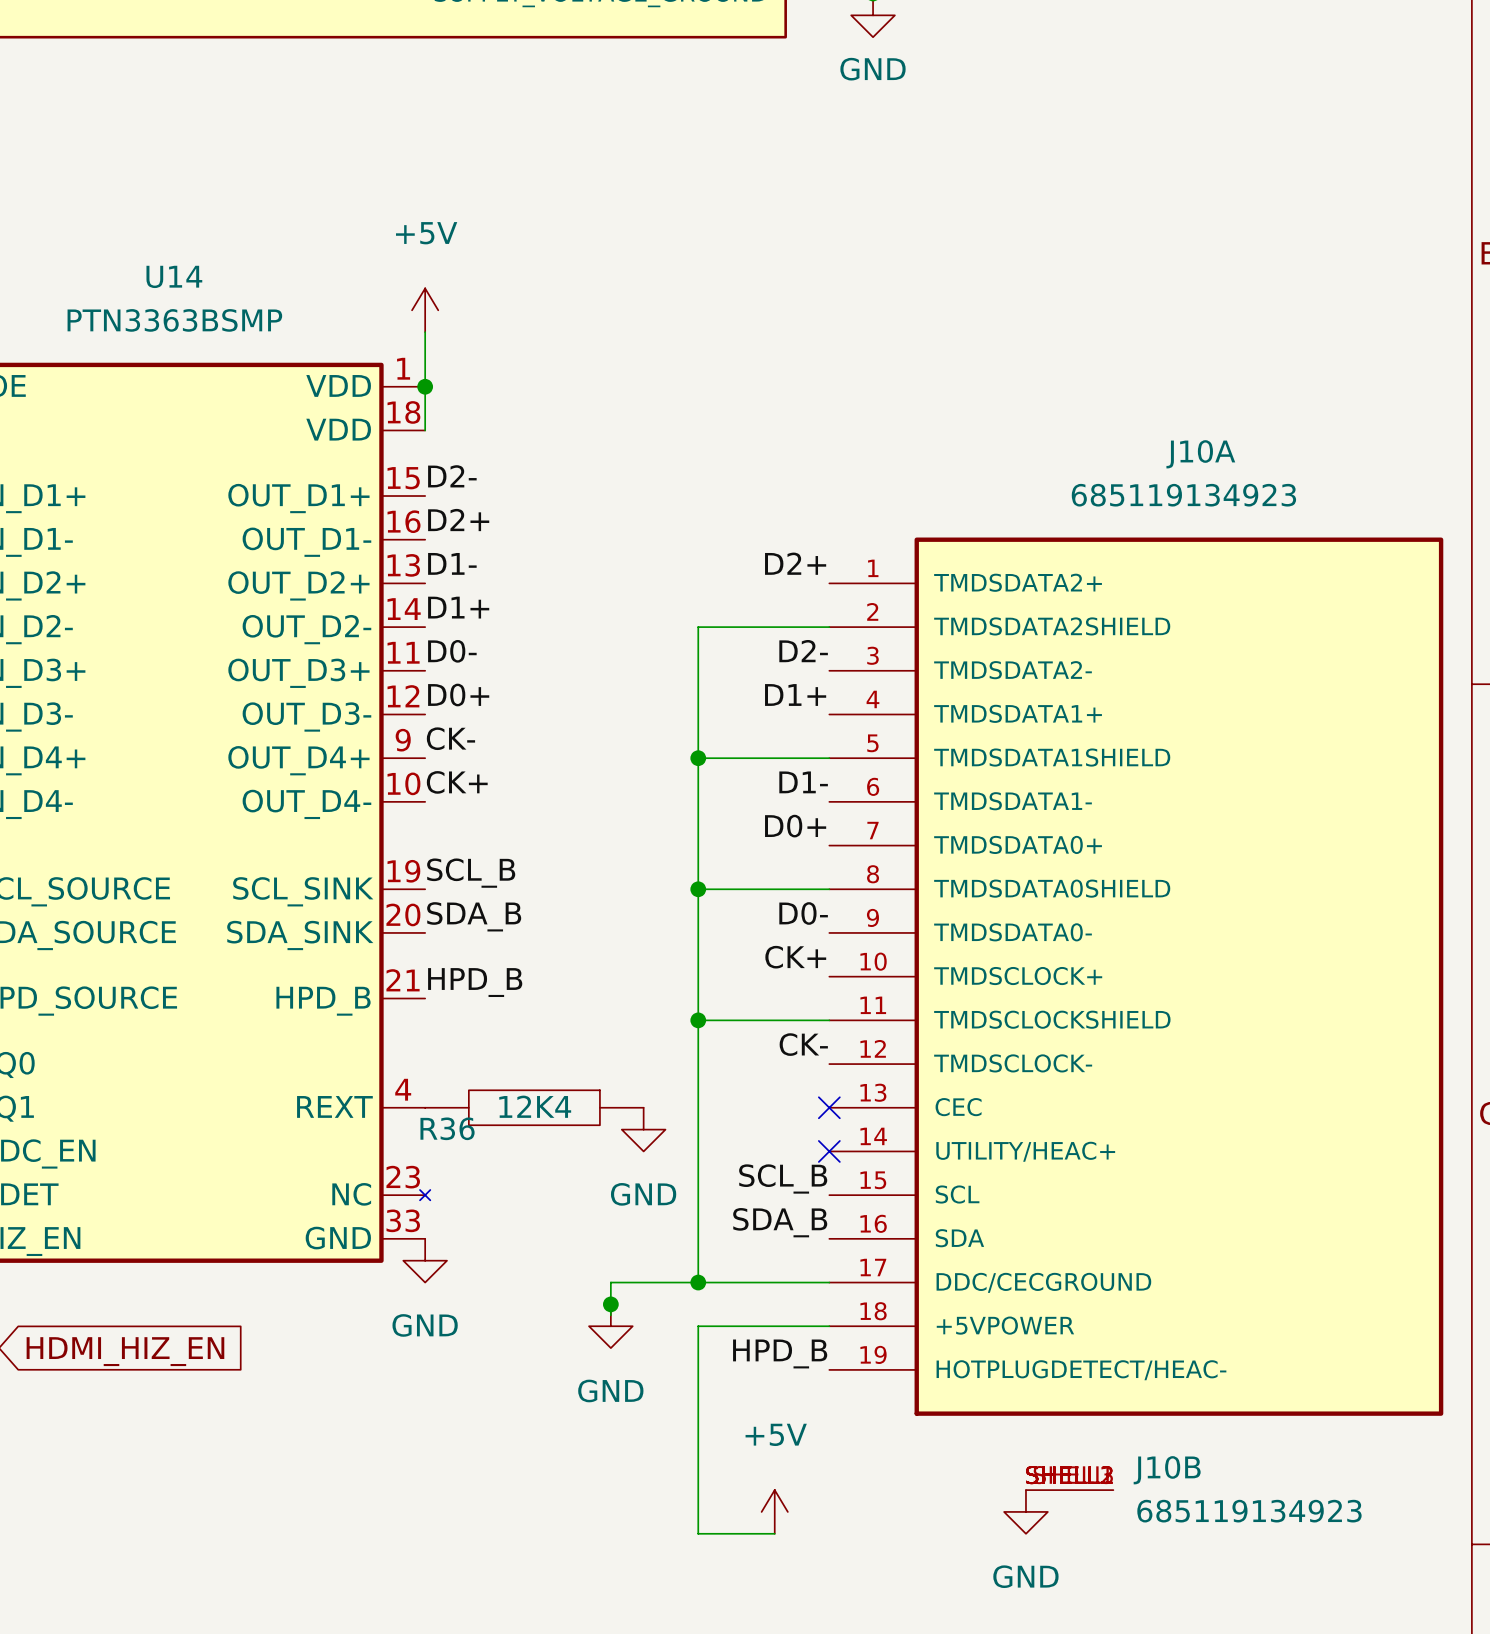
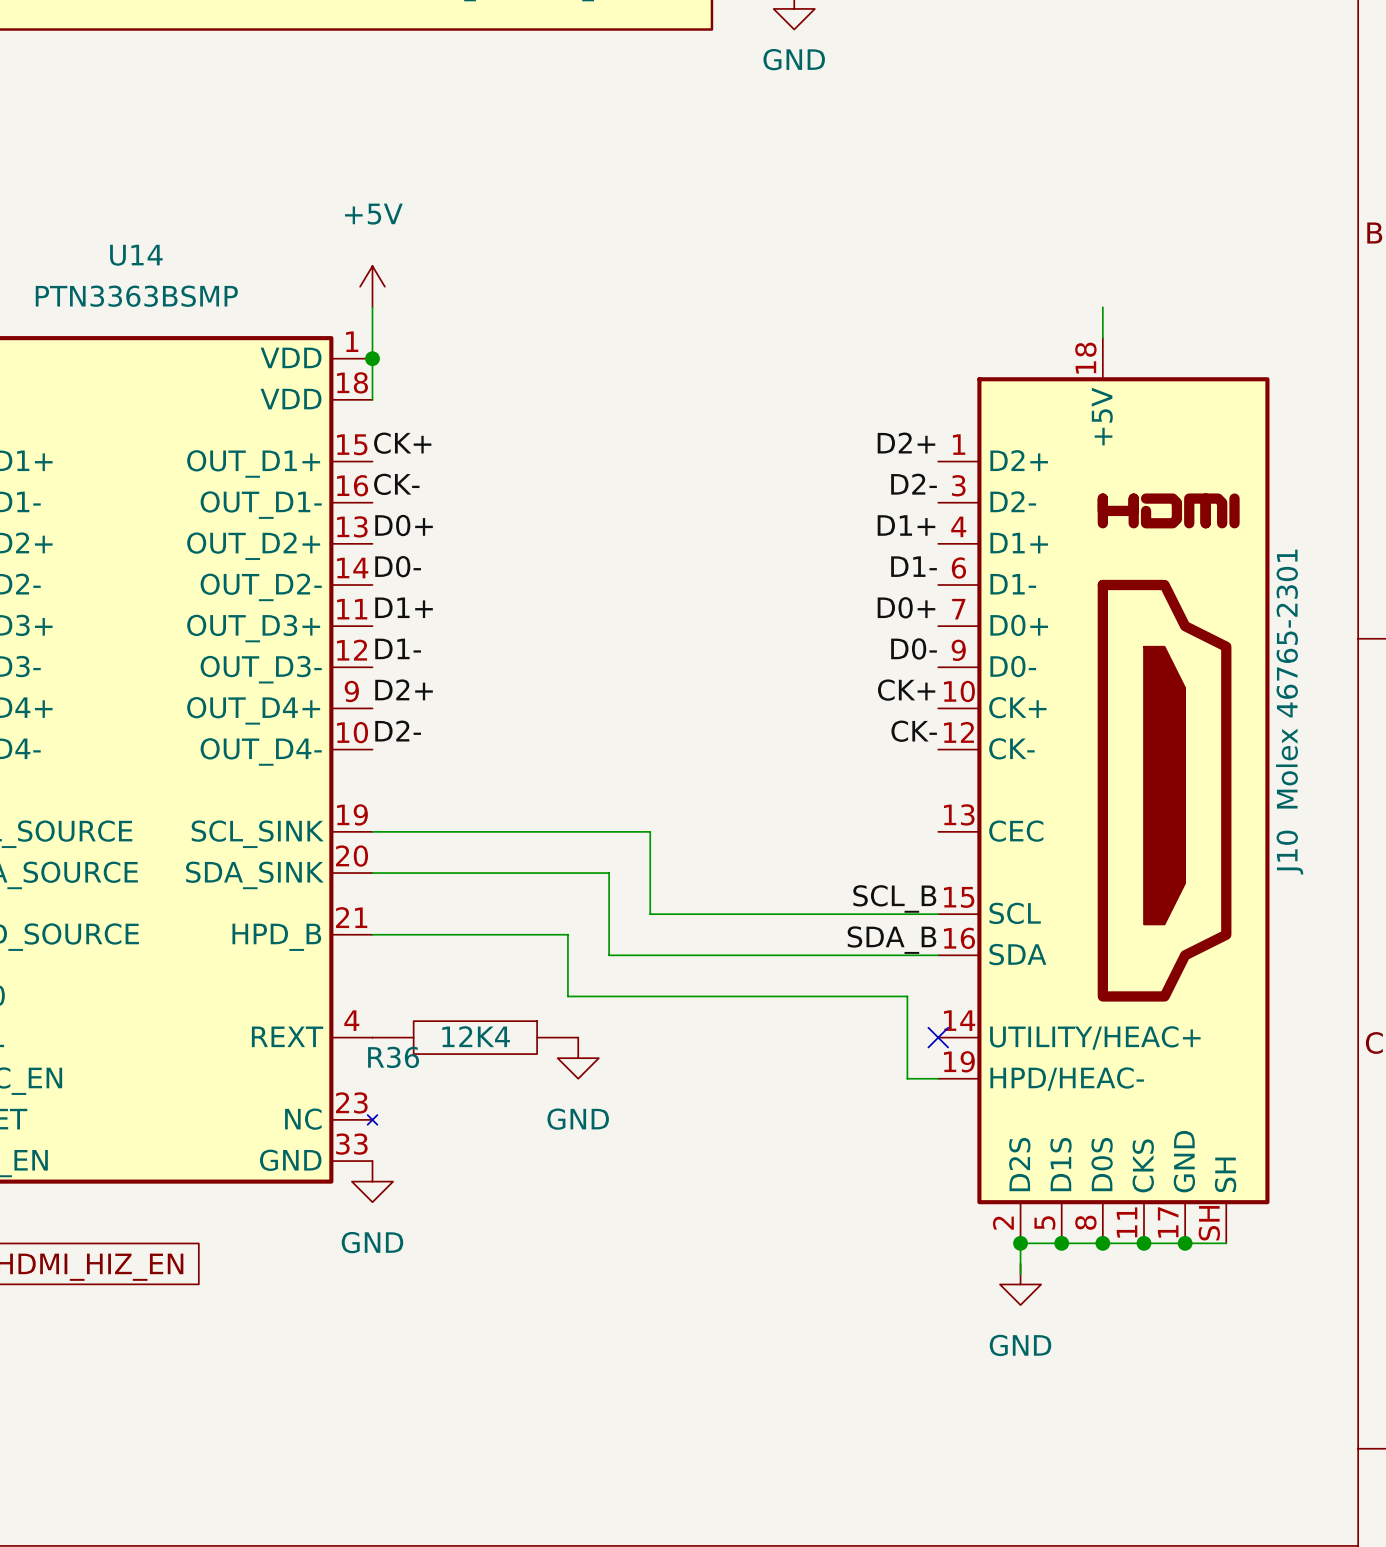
wire: none -> (1102, 307) (1102, 338)
label: D2- (452, 476) -> CK+ (402, 443)
label: D2+ (458, 520) -> CK- (396, 484)
label: D1- (452, 563) -> D0+ (404, 525)
label position: D2+ (795, 563) -> D2+ (906, 443)
label: D1+ (458, 607) -> D0- (398, 566)
wire: (829, 627) (698, 627) (698, 1282) -> none
label: D0- (452, 651) -> D1+ (404, 607)
label position: D2- (803, 651) -> D2- (914, 484)
label position: D1+ (795, 694) -> D1+ (906, 525)
label: D0+ (458, 695) -> D1- (398, 648)
label: CK- (450, 738) -> D2+ (404, 689)
wire: (698, 758) (829, 758) -> none
junction: (698, 758) -> none
label: CK+ (457, 782) -> D2- (398, 731)
label position: D1- (803, 782) -> D1- (914, 566)
label position: D0+ (795, 826) -> D0+ (906, 607)
J10: none -> Molex 46765-2301 (1103, 790)
label: SCL_B (471, 873) -> none
wire: none -> (372, 831) (629, 831)
junction: (698, 889) -> none
wire: (720, 889) (829, 889) -> (650, 831) (650, 914) (938, 914)
label position: D0- (803, 913) -> D0- (914, 648)
label: SDA_B (474, 916) -> none
wire: none -> (372, 873) (609, 873) (609, 955) (629, 955)
label position: CK+ (795, 957) -> CK+ (906, 690)
J10A: 685119134923 (1136, 976) -> none
label: HPD_B (475, 982) -> none
wire: none -> (372, 934) (567, 934) (567, 996) (907, 996) (907, 1078) (938, 1078)
junction: (698, 1020) -> none
label position: CK- (803, 1044) -> CK- (914, 731)
no-connect mark: (829, 1107) -> none
no-connect mark: none -> (938, 1037)
no-connect mark: (829, 1151) -> none
label position: SCL_B (783, 1178) -> SCL_B (894, 898)
label position: SDA_B (780, 1222) -> SDA_B (891, 940)
junction: (698, 1282) -> none
wire: (829, 1282) (610, 1282) (610, 1315) -> none
junction: (610, 1304) -> none
power symbol: GND (610, 1326) -> none
wire: (829, 1326) (698, 1326) (698, 1533) (774, 1533) -> none
junction: none -> (1020, 1243)
junction: none -> (1061, 1243)
junction: none -> (1102, 1243)
junction: none -> (1143, 1243)
junction: none -> (1185, 1243)
label: HPD_B (780, 1353) -> none
J10B: 685119134923 (1069, 1490) -> none
power symbol: +5V (774, 1511) -> none
power symbol position: GND (1025, 1511) -> GND (1020, 1284)

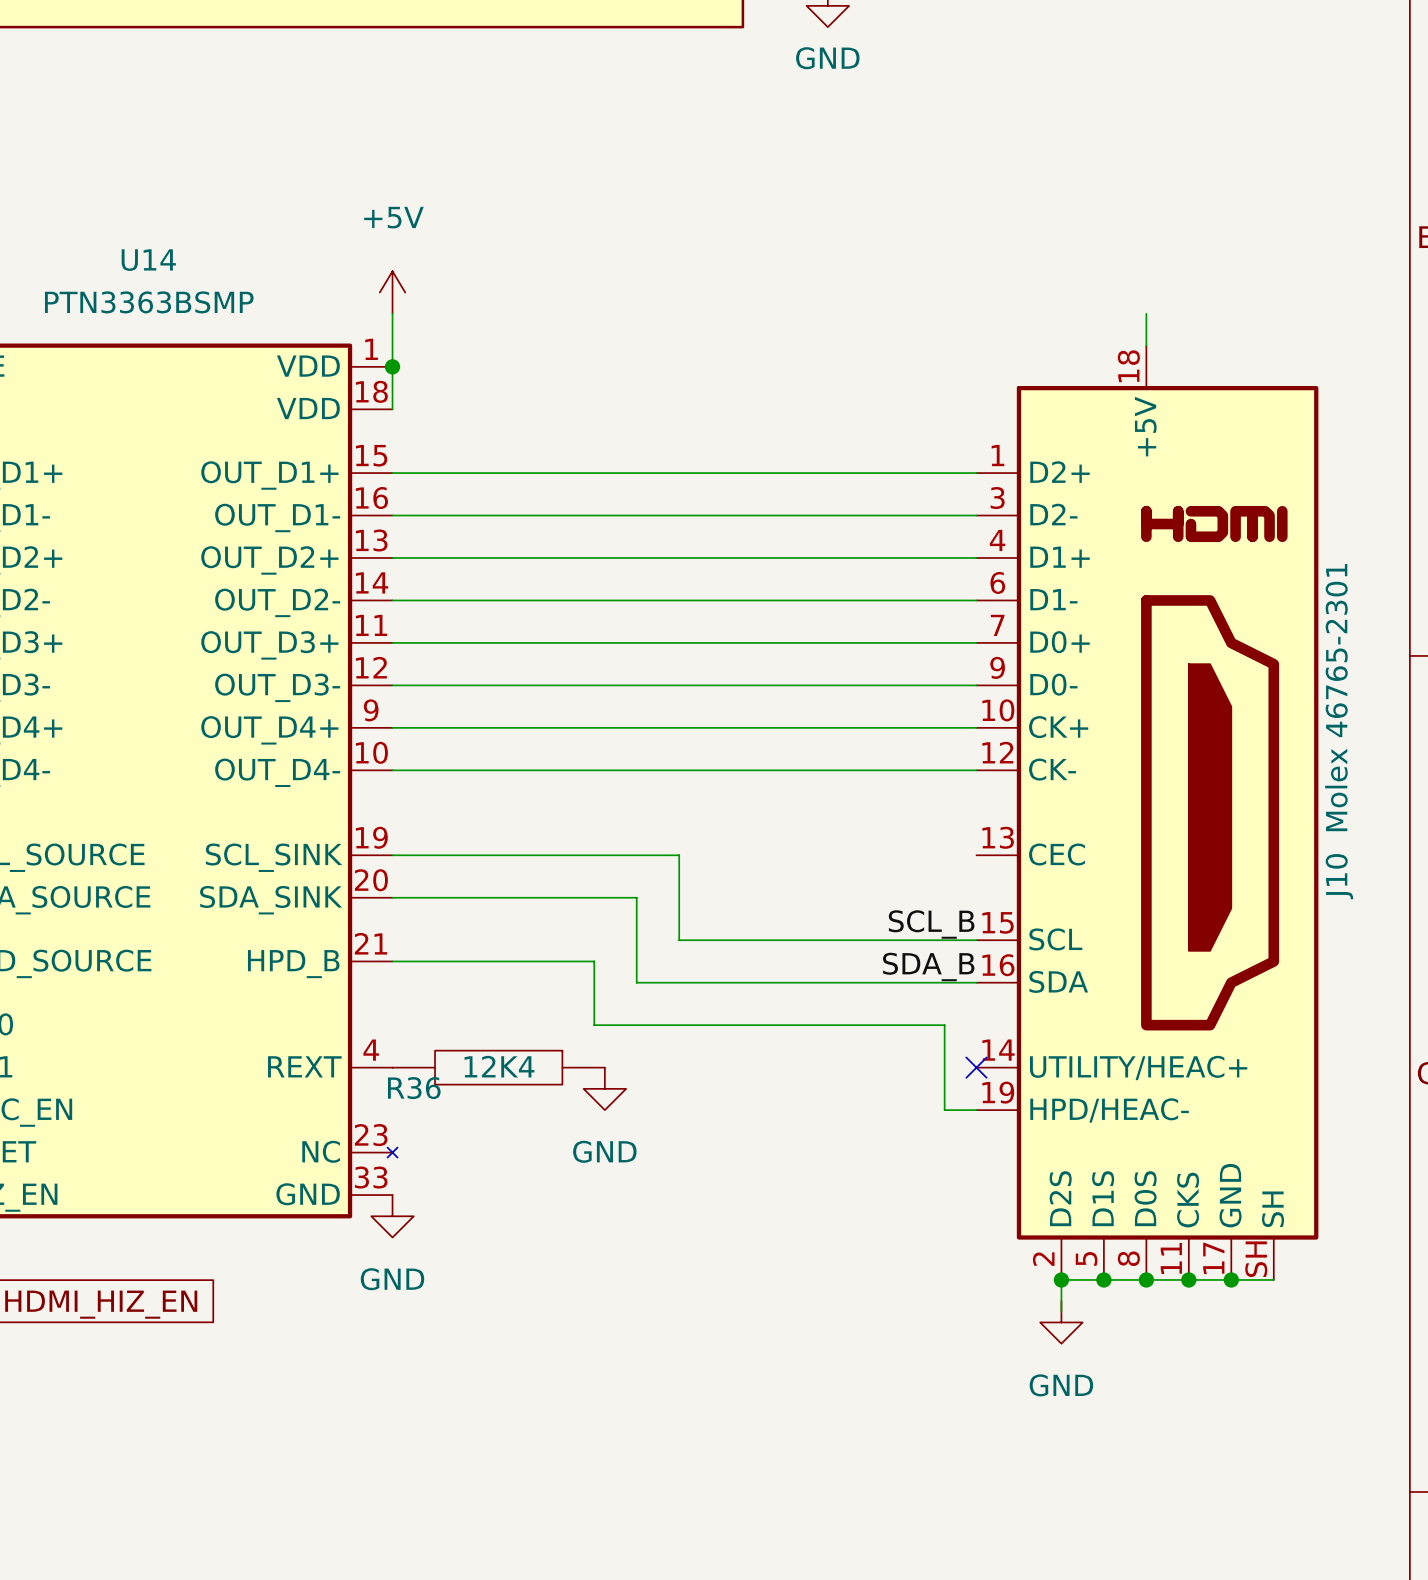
label: CK+ (402, 443) -> none
label: D2+ (906, 443) -> none
wire: none -> (392, 473) (976, 473)
label: CK- (396, 484) -> none
label: D2- (914, 484) -> none
wire: none -> (392, 515) (976, 515)
label: D0+ (404, 525) -> none
label: D1+ (906, 525) -> none
wire: none -> (392, 557) (976, 557)
label: D0- (398, 566) -> none
label: D1- (914, 566) -> none
wire: none -> (392, 600) (976, 600)
label: D1+ (404, 607) -> none
label: D0+ (906, 607) -> none
wire: none -> (392, 642) (976, 642)
label: D1- (398, 648) -> none
label: D0- (914, 648) -> none
wire: none -> (392, 685) (976, 685)
label: D2+ (404, 689) -> none
label: CK+ (906, 690) -> none
wire: none -> (392, 727) (976, 727)
label: D2- (398, 731) -> none
label: CK- (914, 731) -> none
wire: none -> (392, 770) (976, 770)

